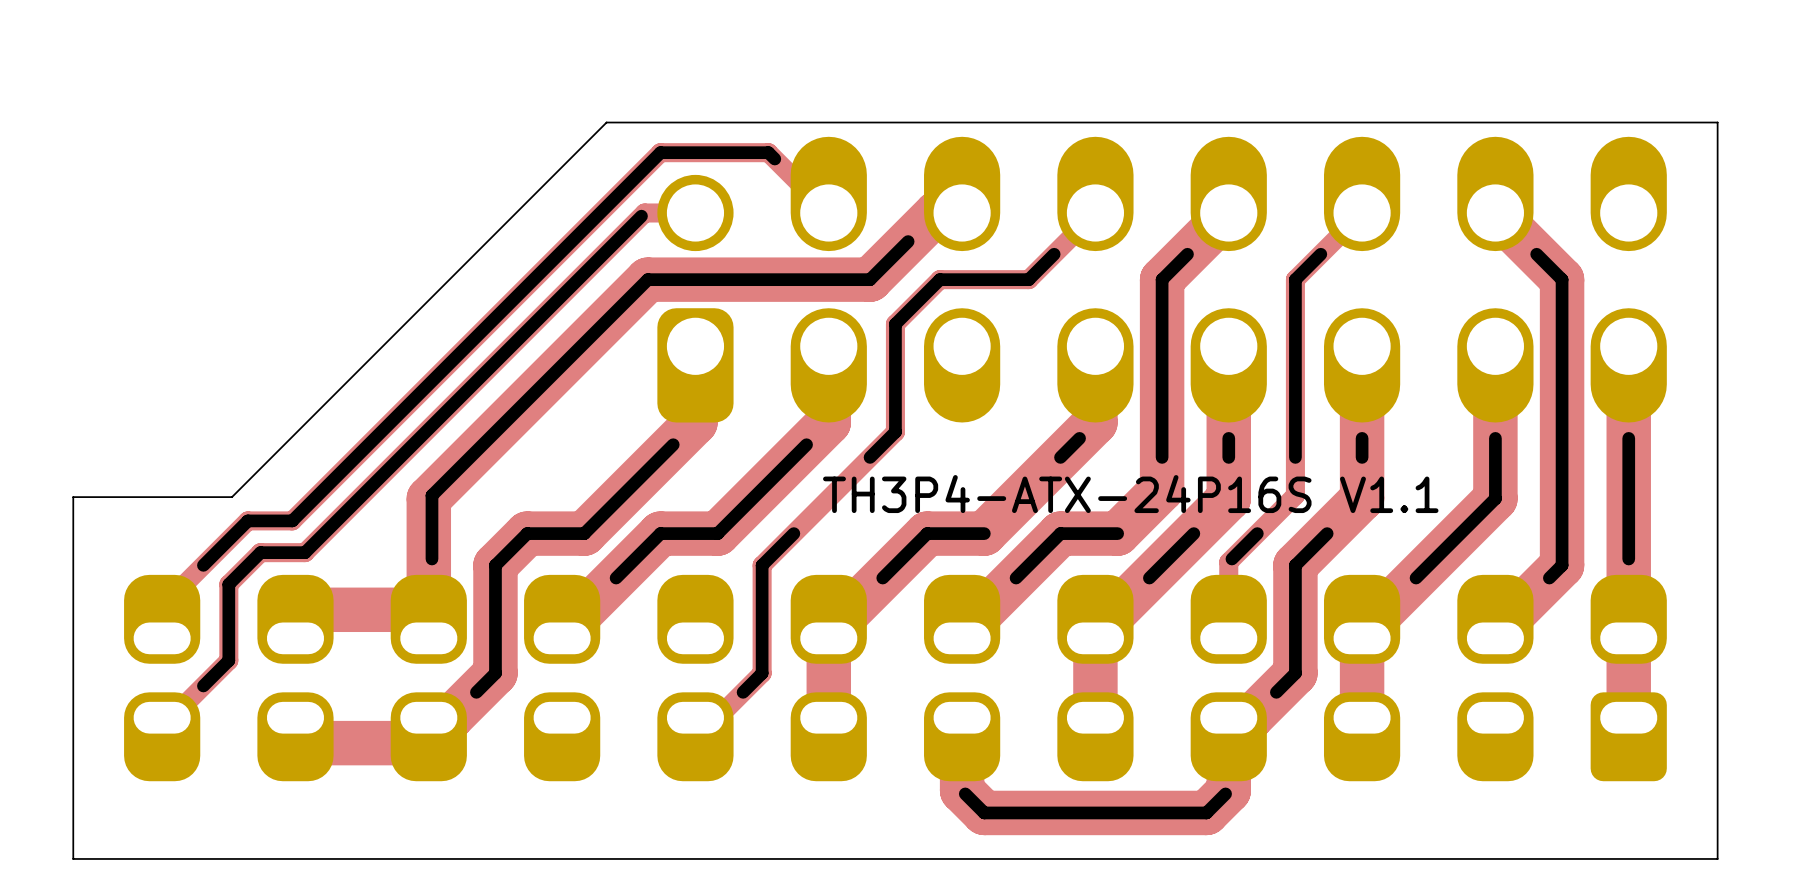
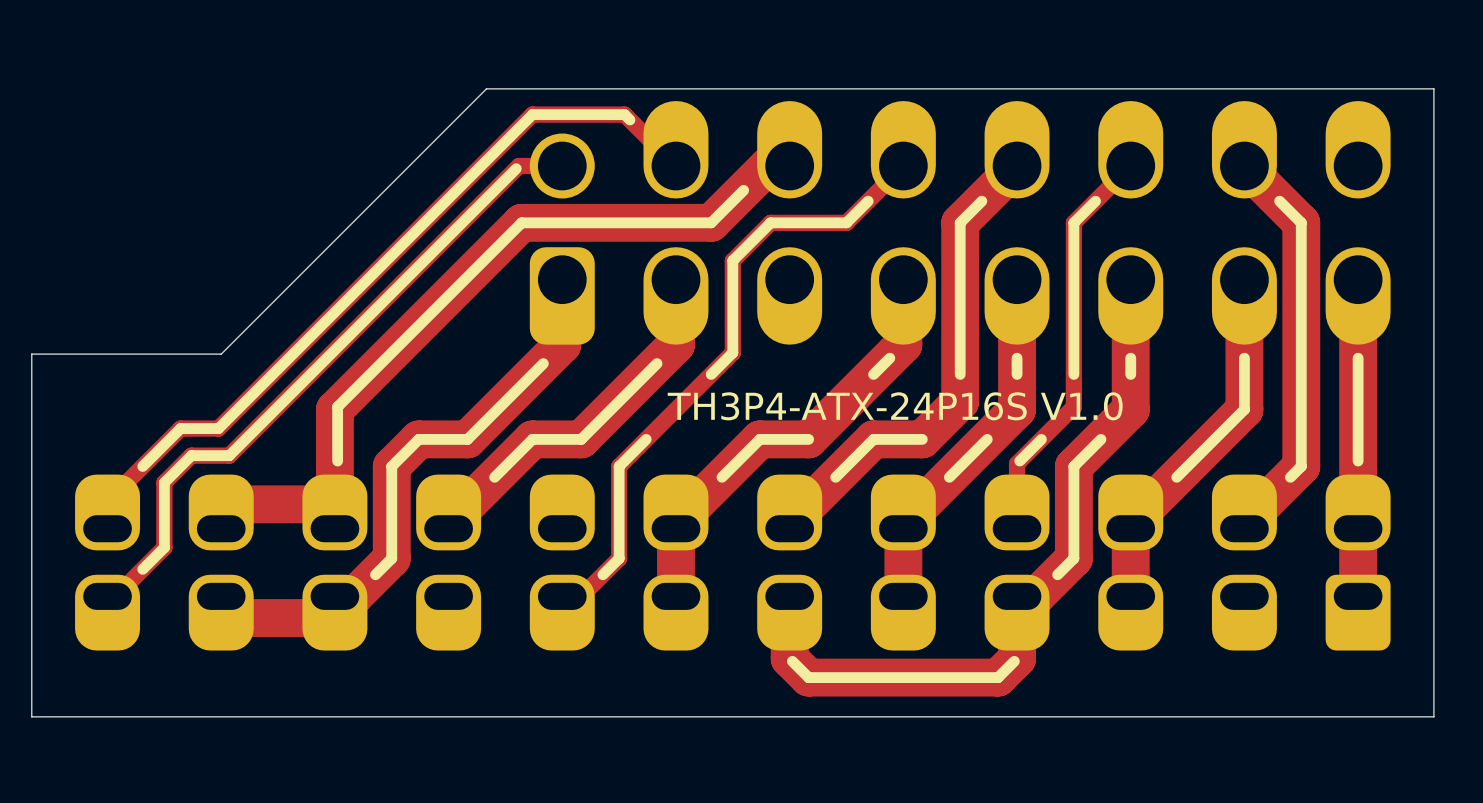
board edge: (295, 433) (231, 497) (73, 497) -> (221, 354) (31, 354) (31, 408)
text: TH3P4-ATX-24P16S V1.1 (1130, 494) -> TH3P4-ATX-24P16S V1.0 (895, 406)

